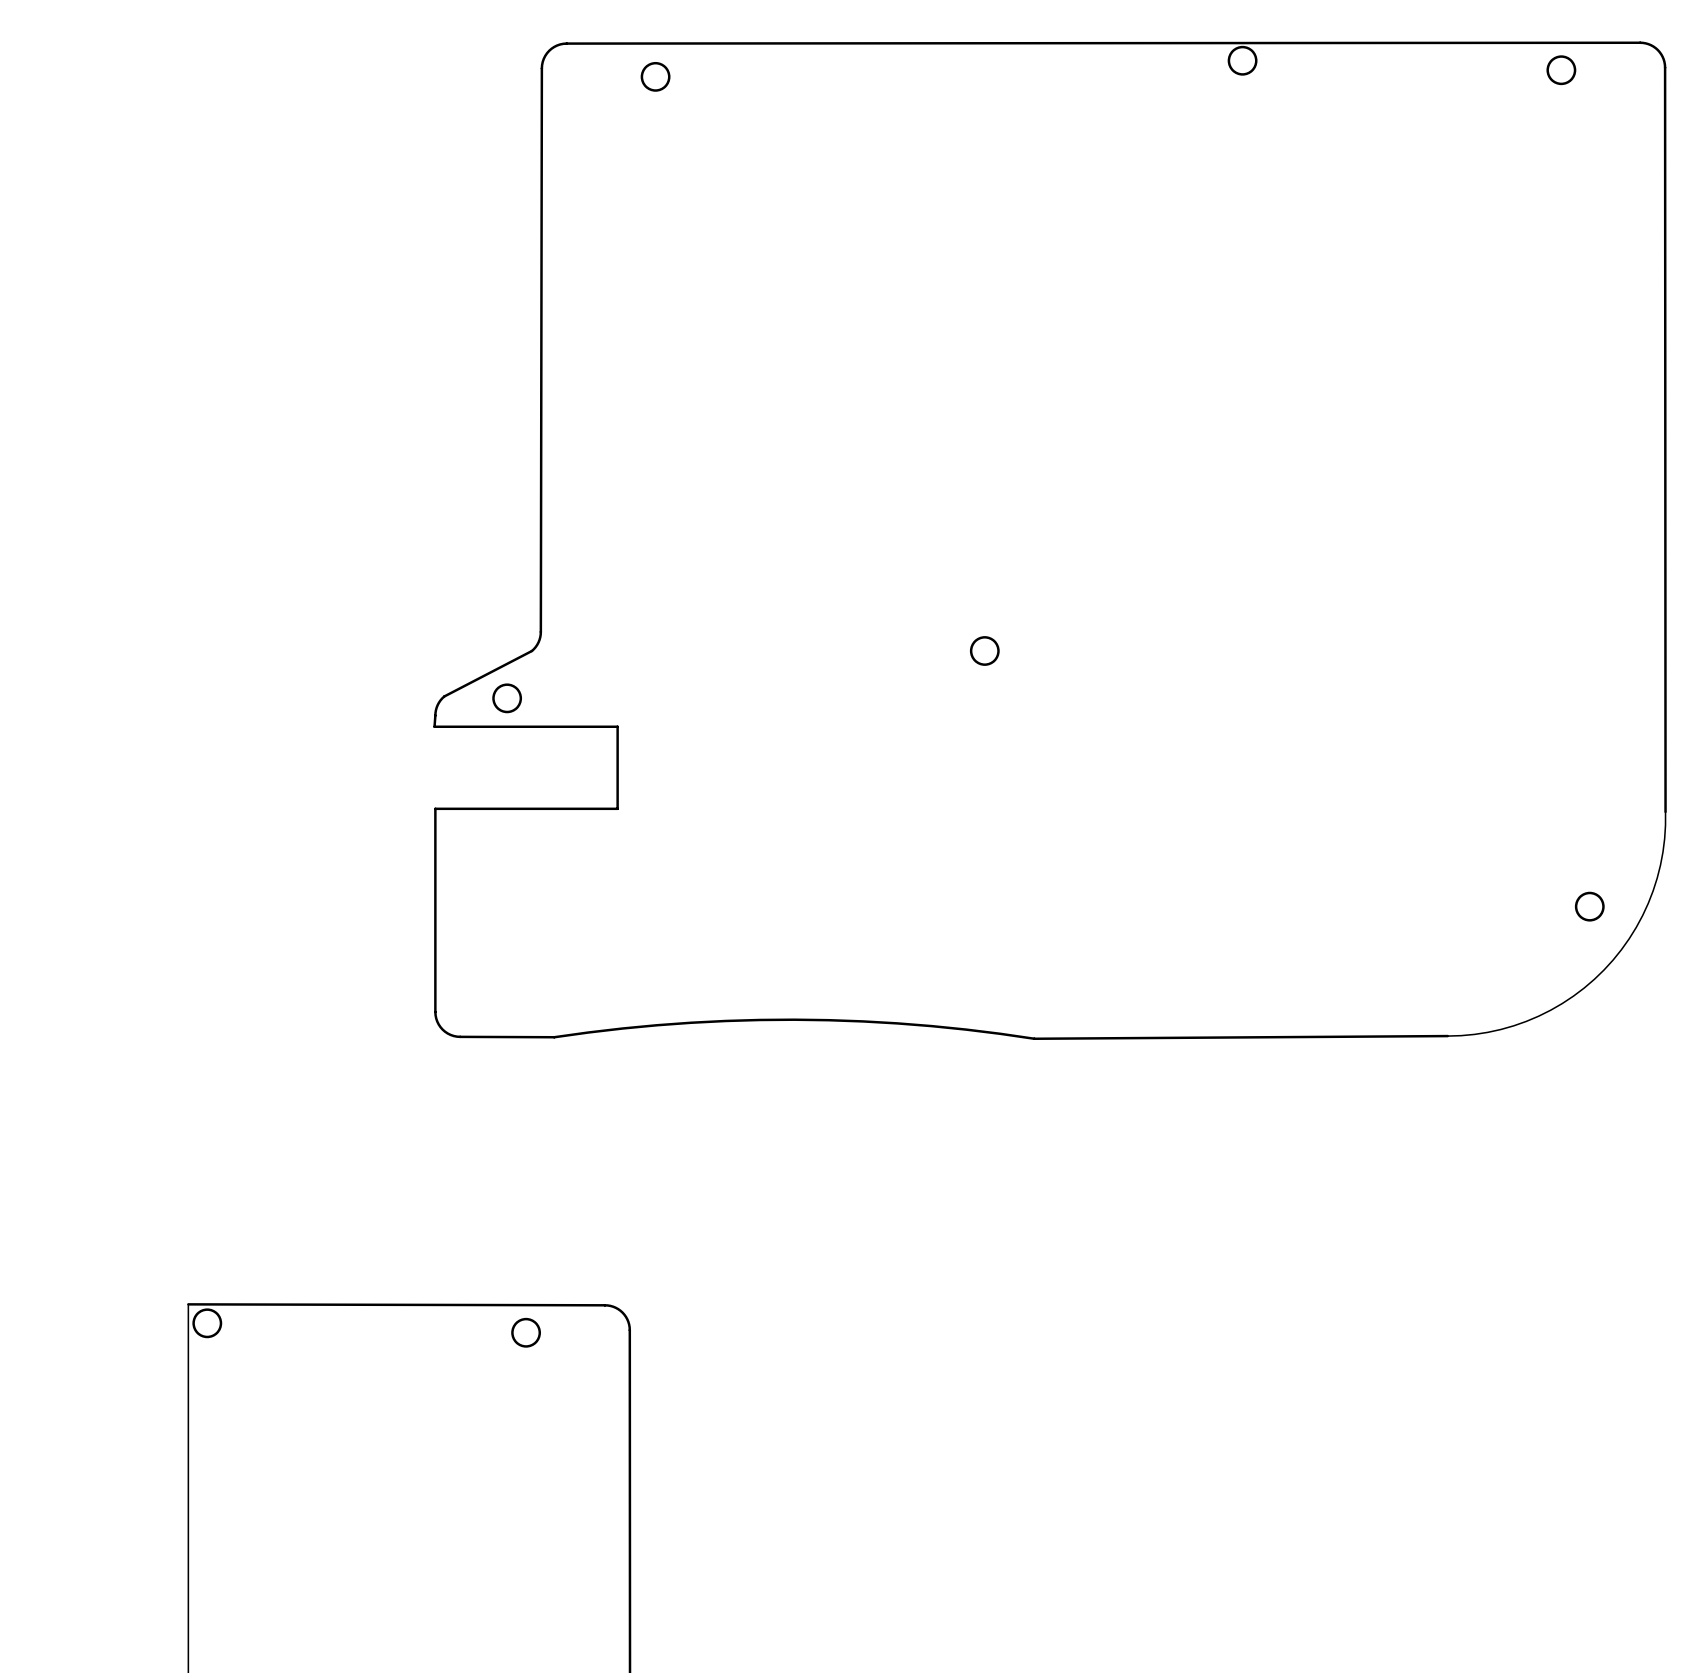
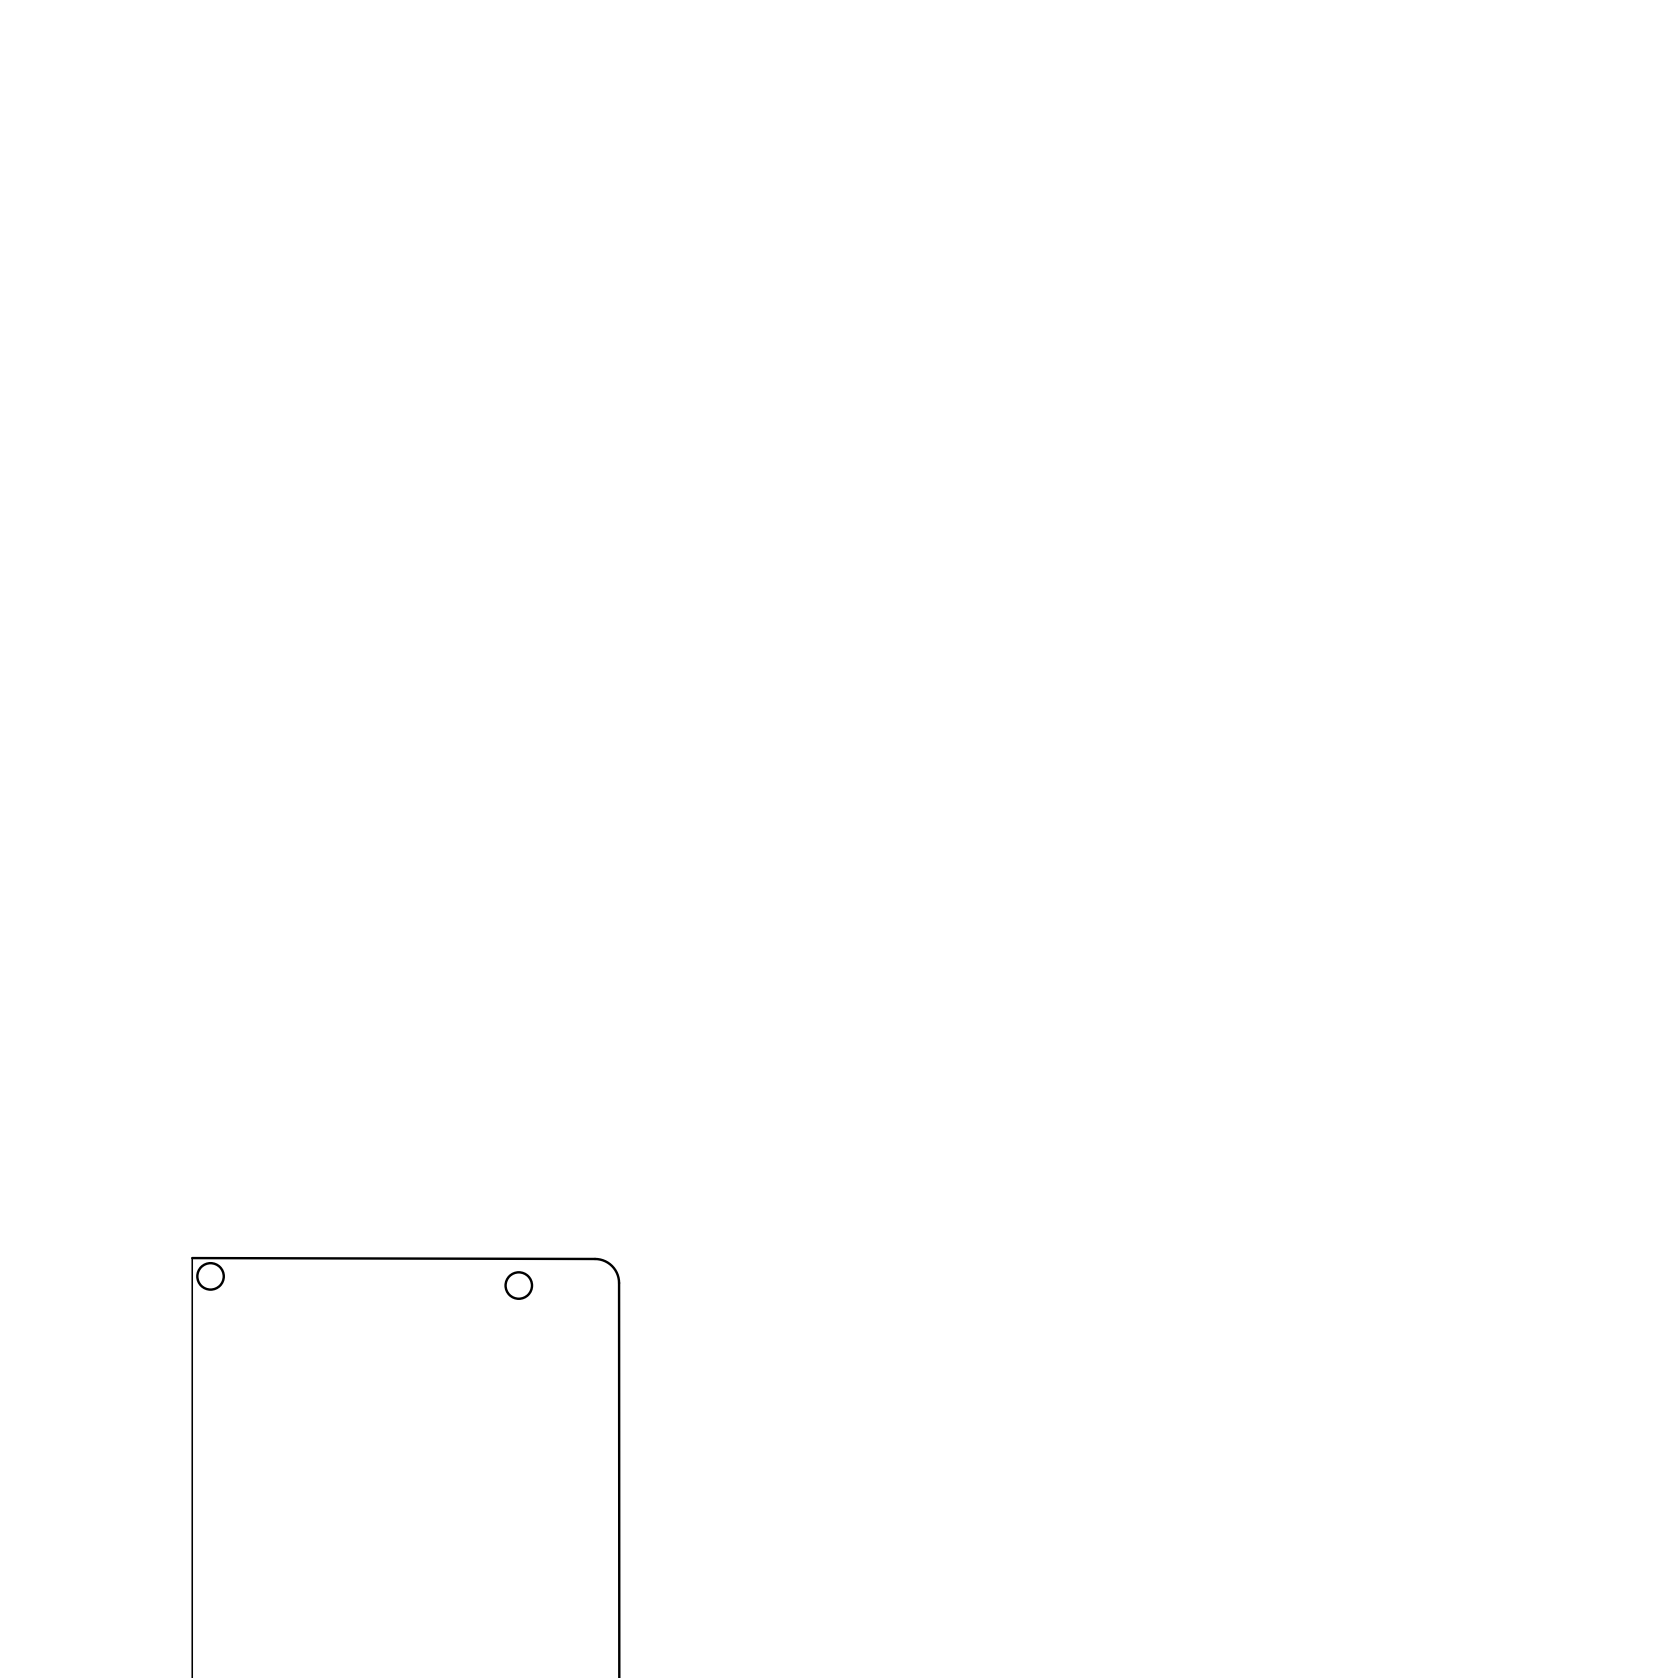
board edge: (1640, 42) (566, 43) (551, 48) (545, 56) (541, 68) (540, 637) (531, 650) (444, 696) (436, 707) (434, 726) (617, 726) (617, 808) (435, 808) (435, 1012) (440, 1027) (447, 1033) (456, 1036) (554, 1037) (656, 1025) (794, 1019) (931, 1026) (1034, 1038) (1461, 1035) (1500, 1029) (1526, 1021) (1550, 1010) (1584, 988) (1604, 970) (1621, 949) (1642, 915) (1653, 890) (1660, 865) (1665, 825) (1665, 67) (1663, 59) (1657, 50) (1648, 44) (1640, 42) -> none
round board edge: [1227, 45, 1258, 76] -> none
round board edge: [1546, 55, 1577, 86] -> none
round board edge: [640, 61, 671, 92] -> none
round board edge: [969, 636, 1000, 666] -> none
round board edge: [492, 683, 523, 714] -> none
round board edge: [1574, 891, 1605, 922] -> none

